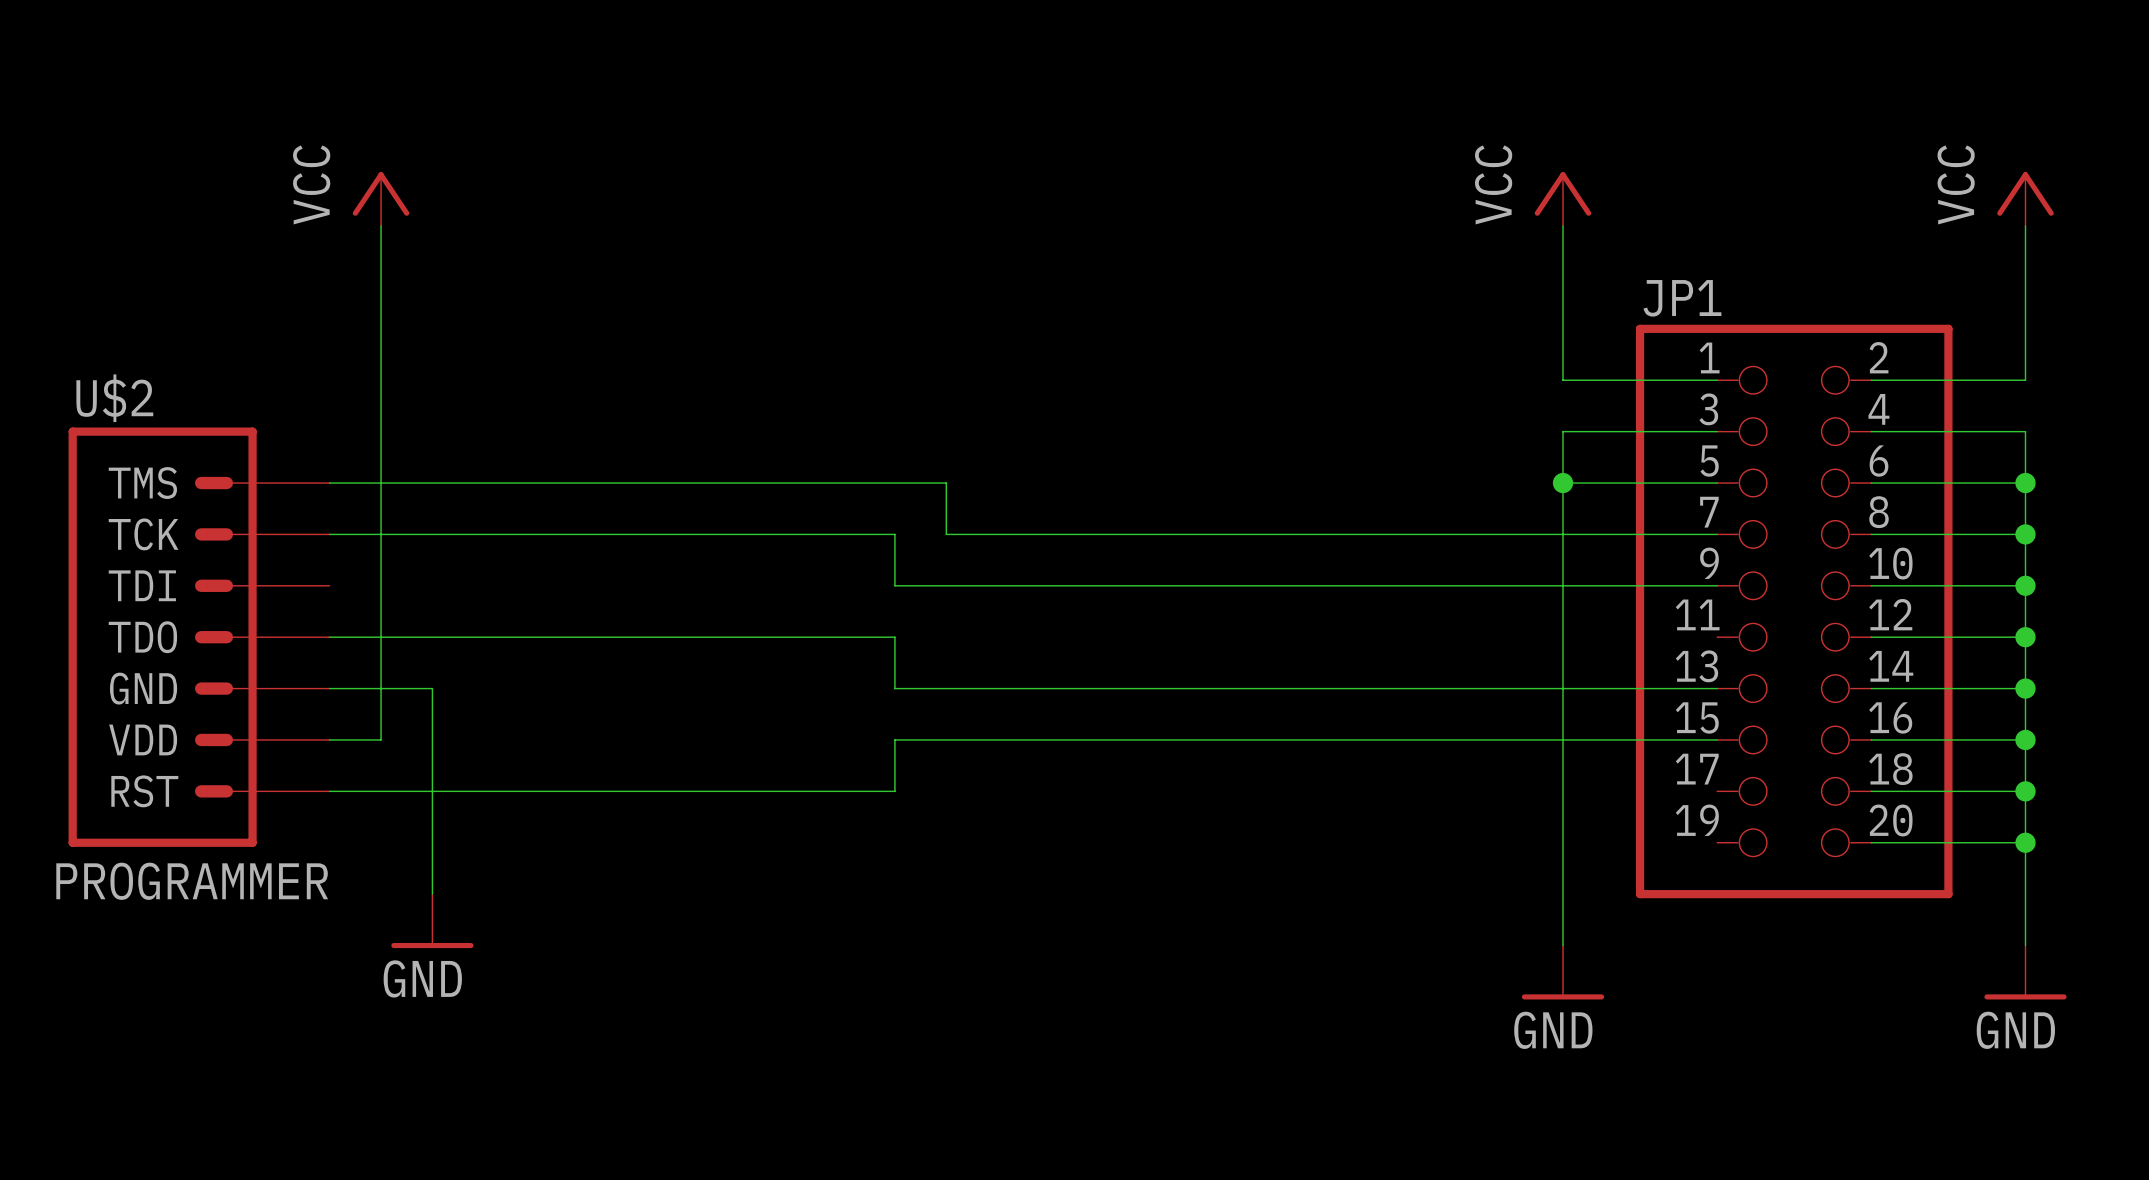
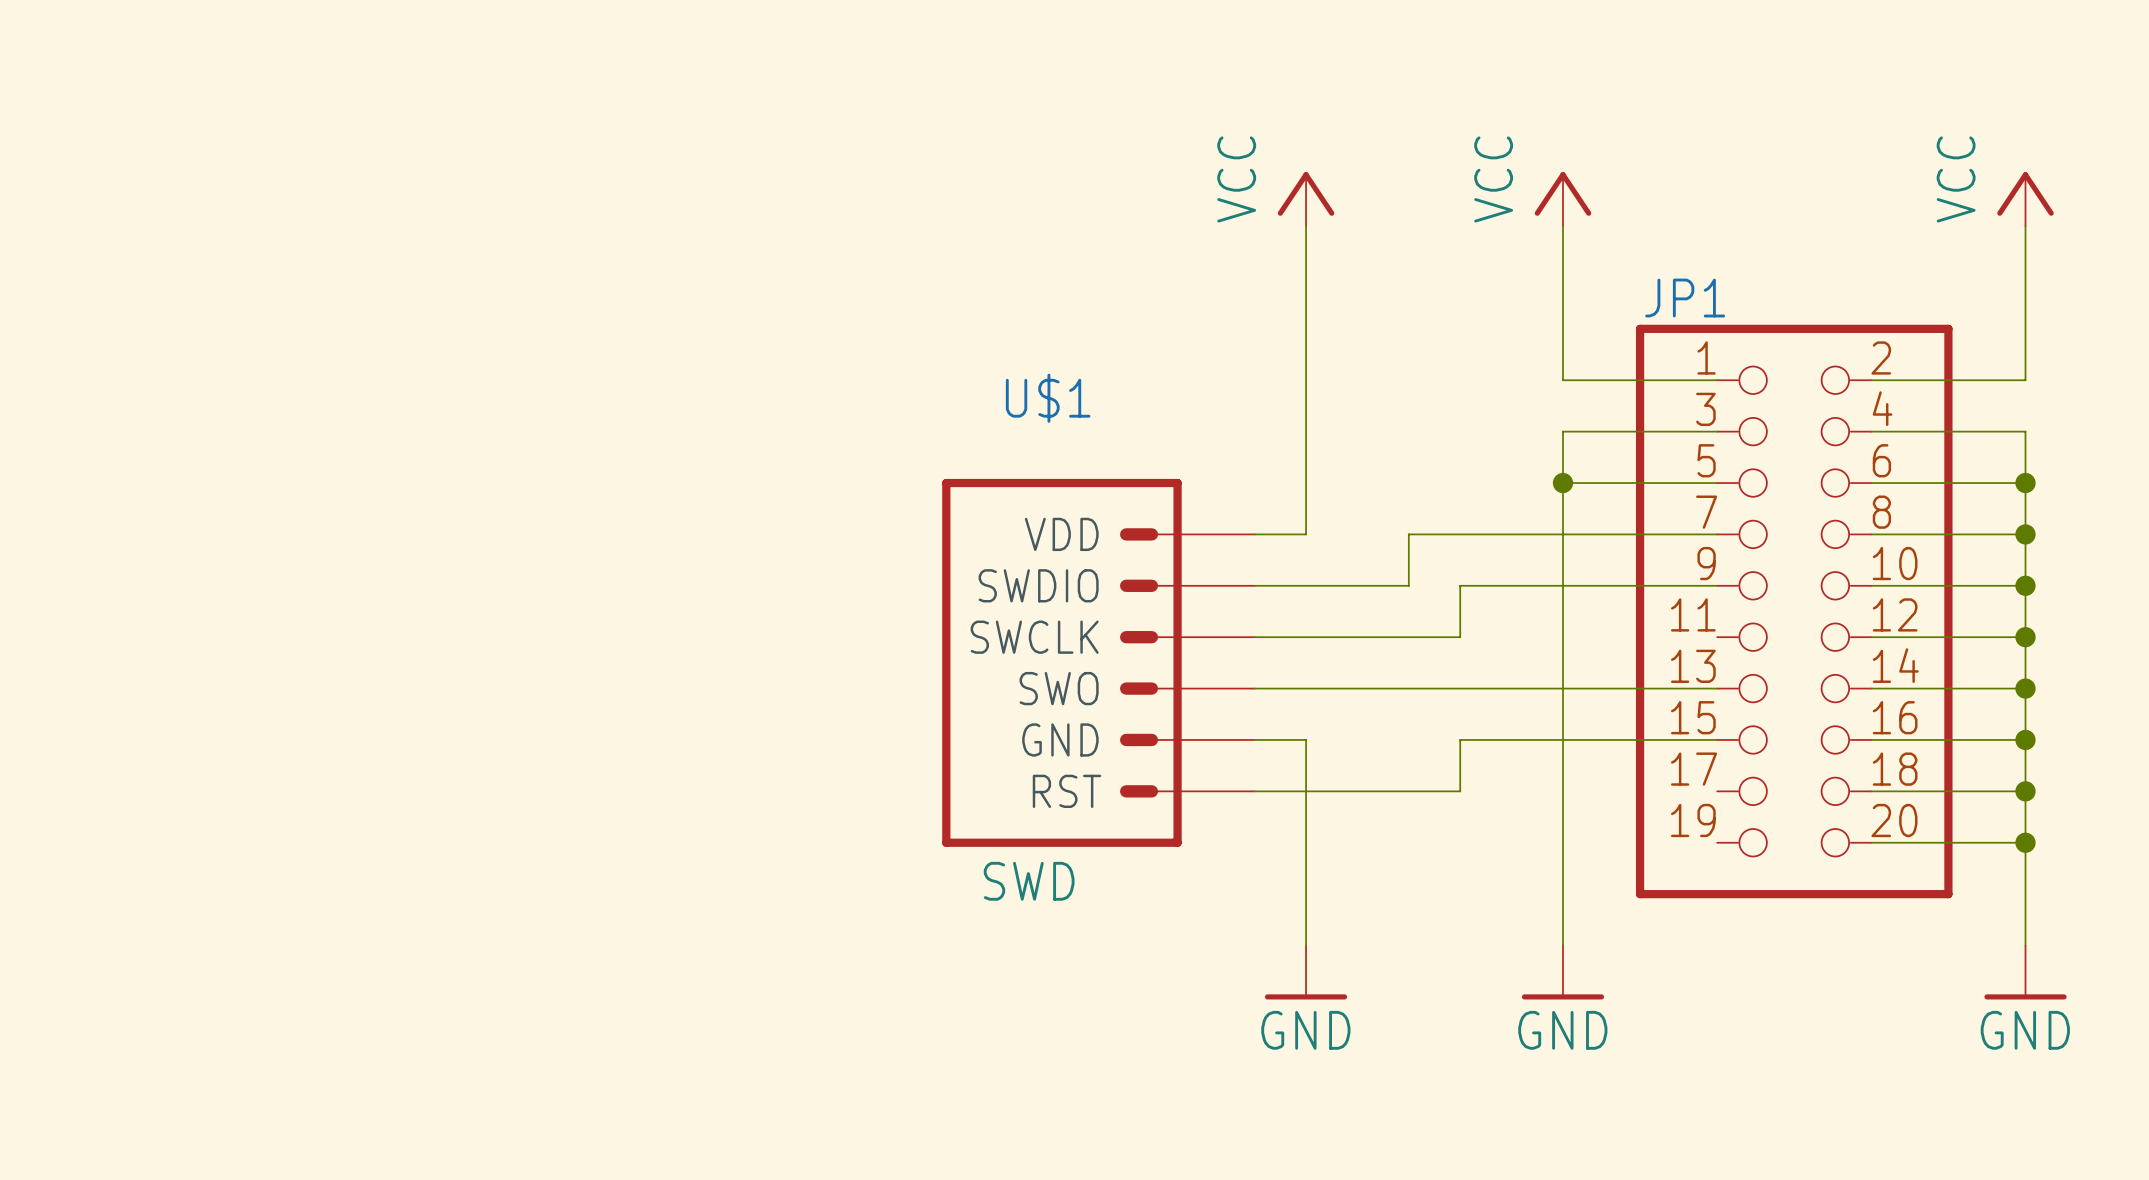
power symbol: VCC (381, 199) -> none
power symbol: none -> VCC (1306, 199)
wire: (381, 226) (381, 739) (329, 739) -> none
wire: (329, 483) (946, 483) (946, 534) (1254, 534) -> none
wire: (329, 534) (894, 534) (894, 585) (1254, 585) -> none
wire: (1306, 534) (1408, 534) -> (1306, 534) (1306, 226)
wire: (1408, 585) (1460, 585) -> (1408, 585) (1408, 534)
wire: none -> (1460, 585) (1460, 637) (1254, 637)
U$2: PROGRAMMER (199, 637) -> none
wire: (329, 637) (894, 637) (894, 688) (1254, 688) -> none
U$1: none -> SWD (1098, 662)
wire: (329, 688) (432, 688) (432, 894) -> none
wire: (1254, 739) (894, 739) (894, 791) (329, 791) -> none
wire: (1306, 739) (1460, 739) -> (1254, 791) (1460, 791) (1460, 739)
wire: none -> (1306, 739) (1306, 945)
power symbol: GND (432, 921) -> none
power symbol: none -> GND (1306, 972)

